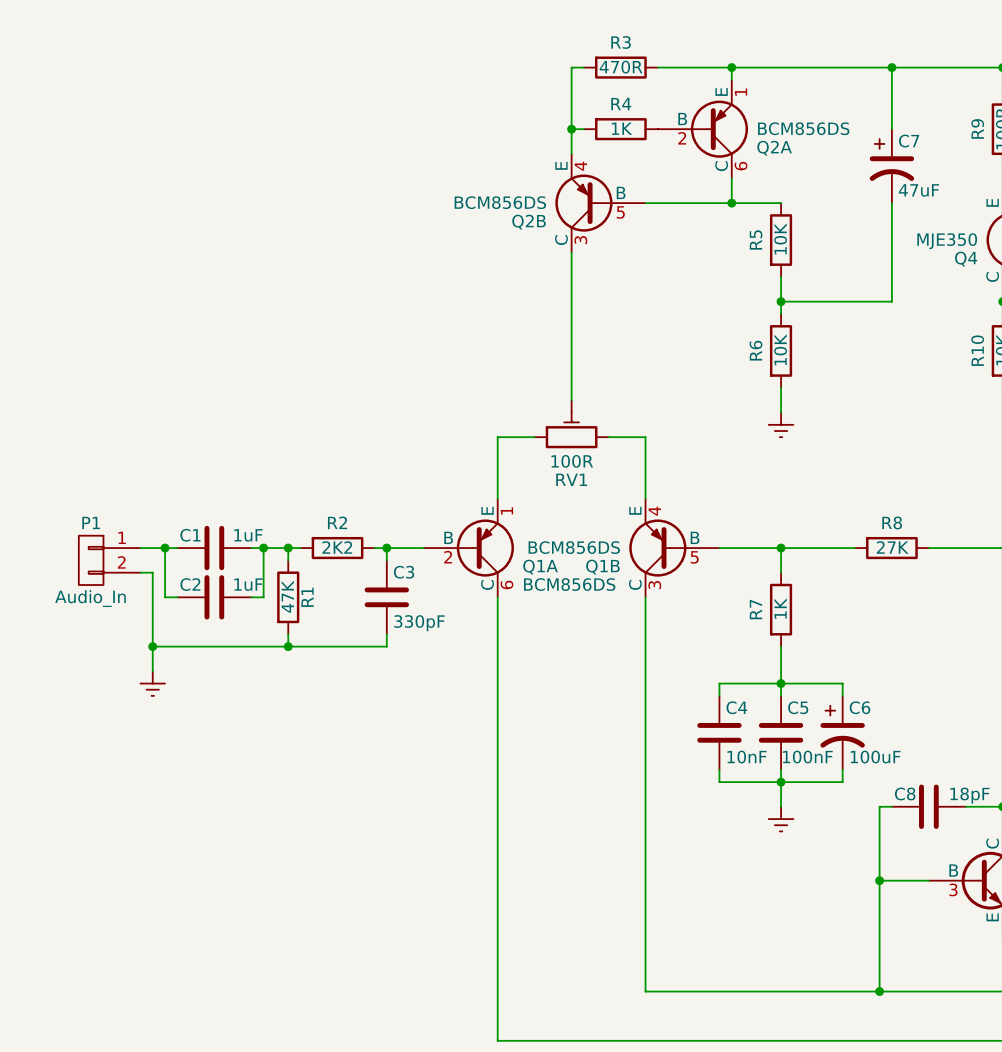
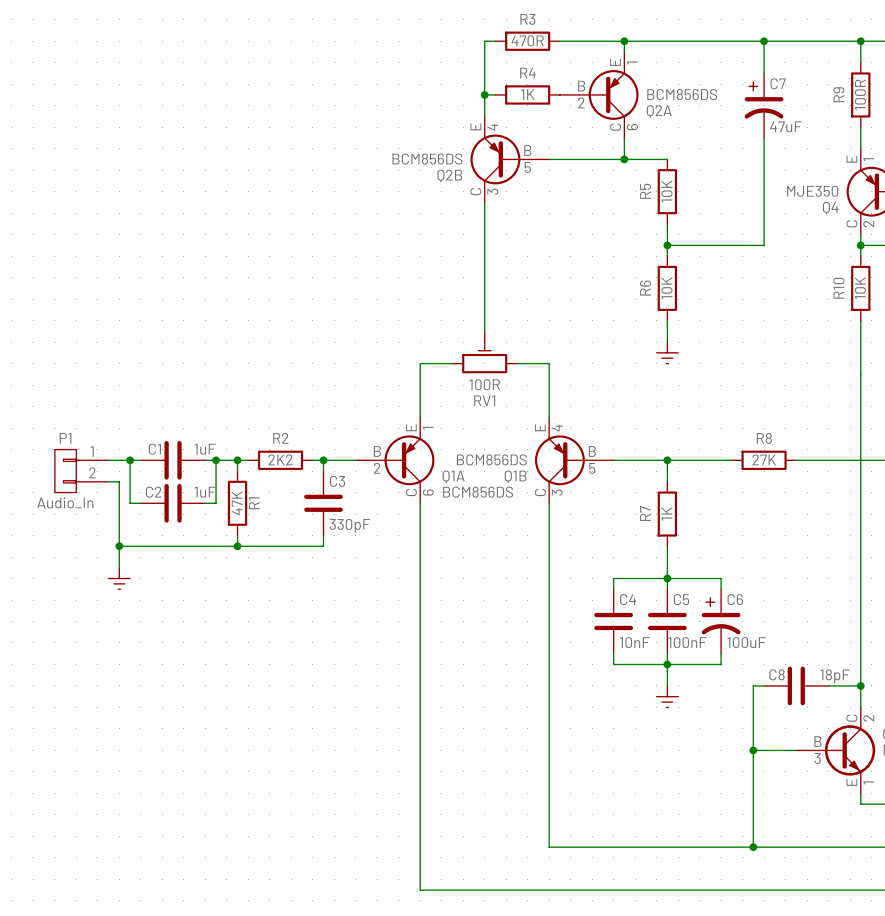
C7 position: (891, 166) -> (764, 105)

